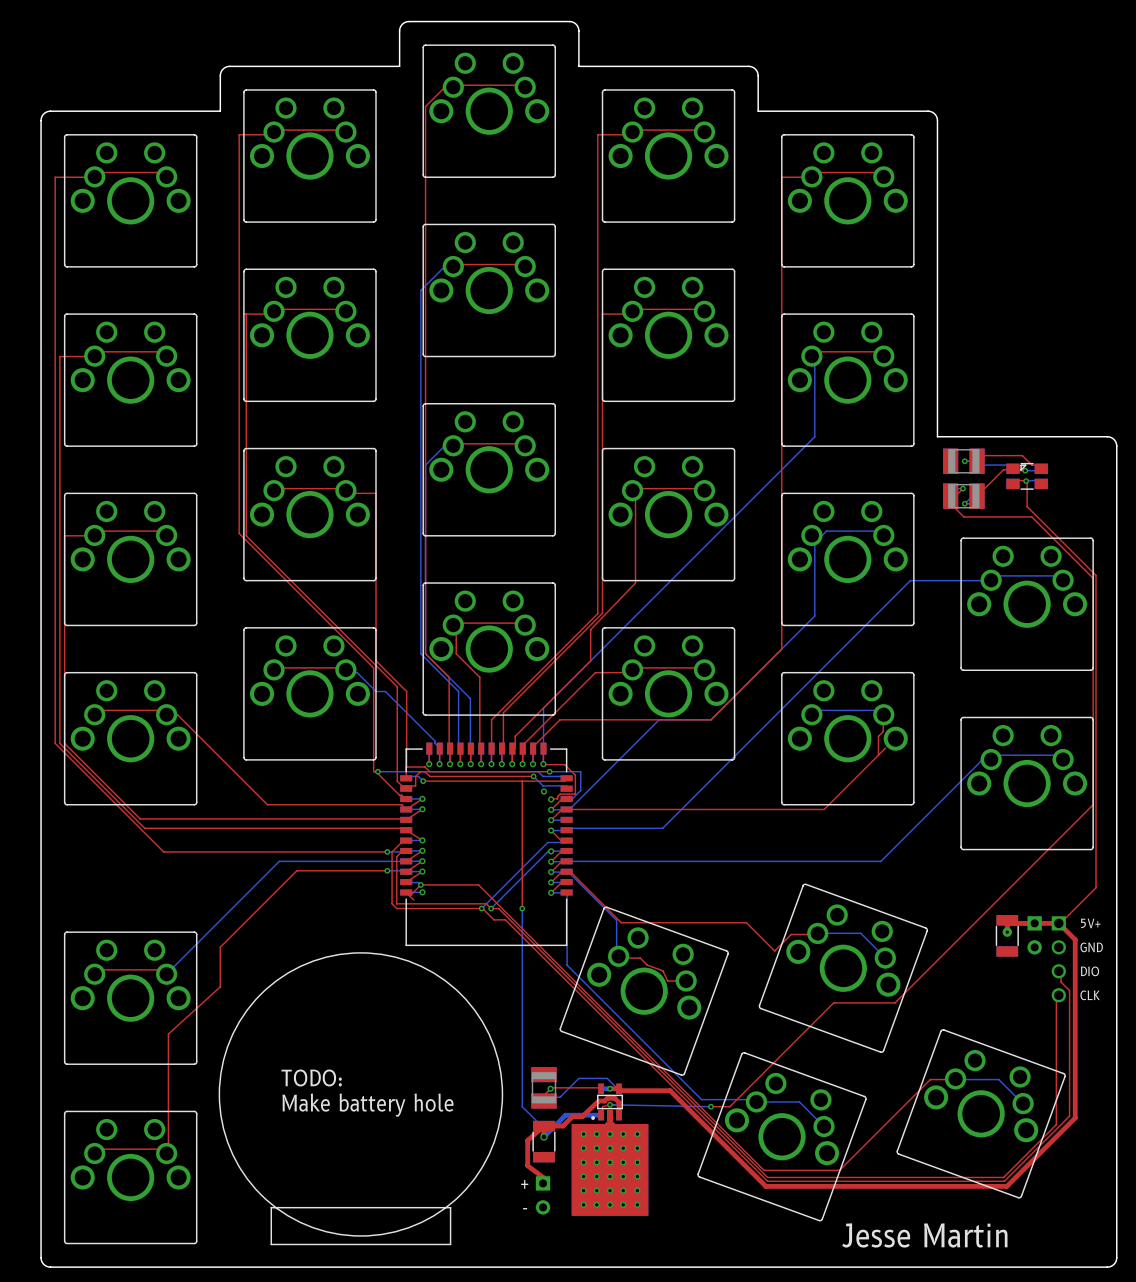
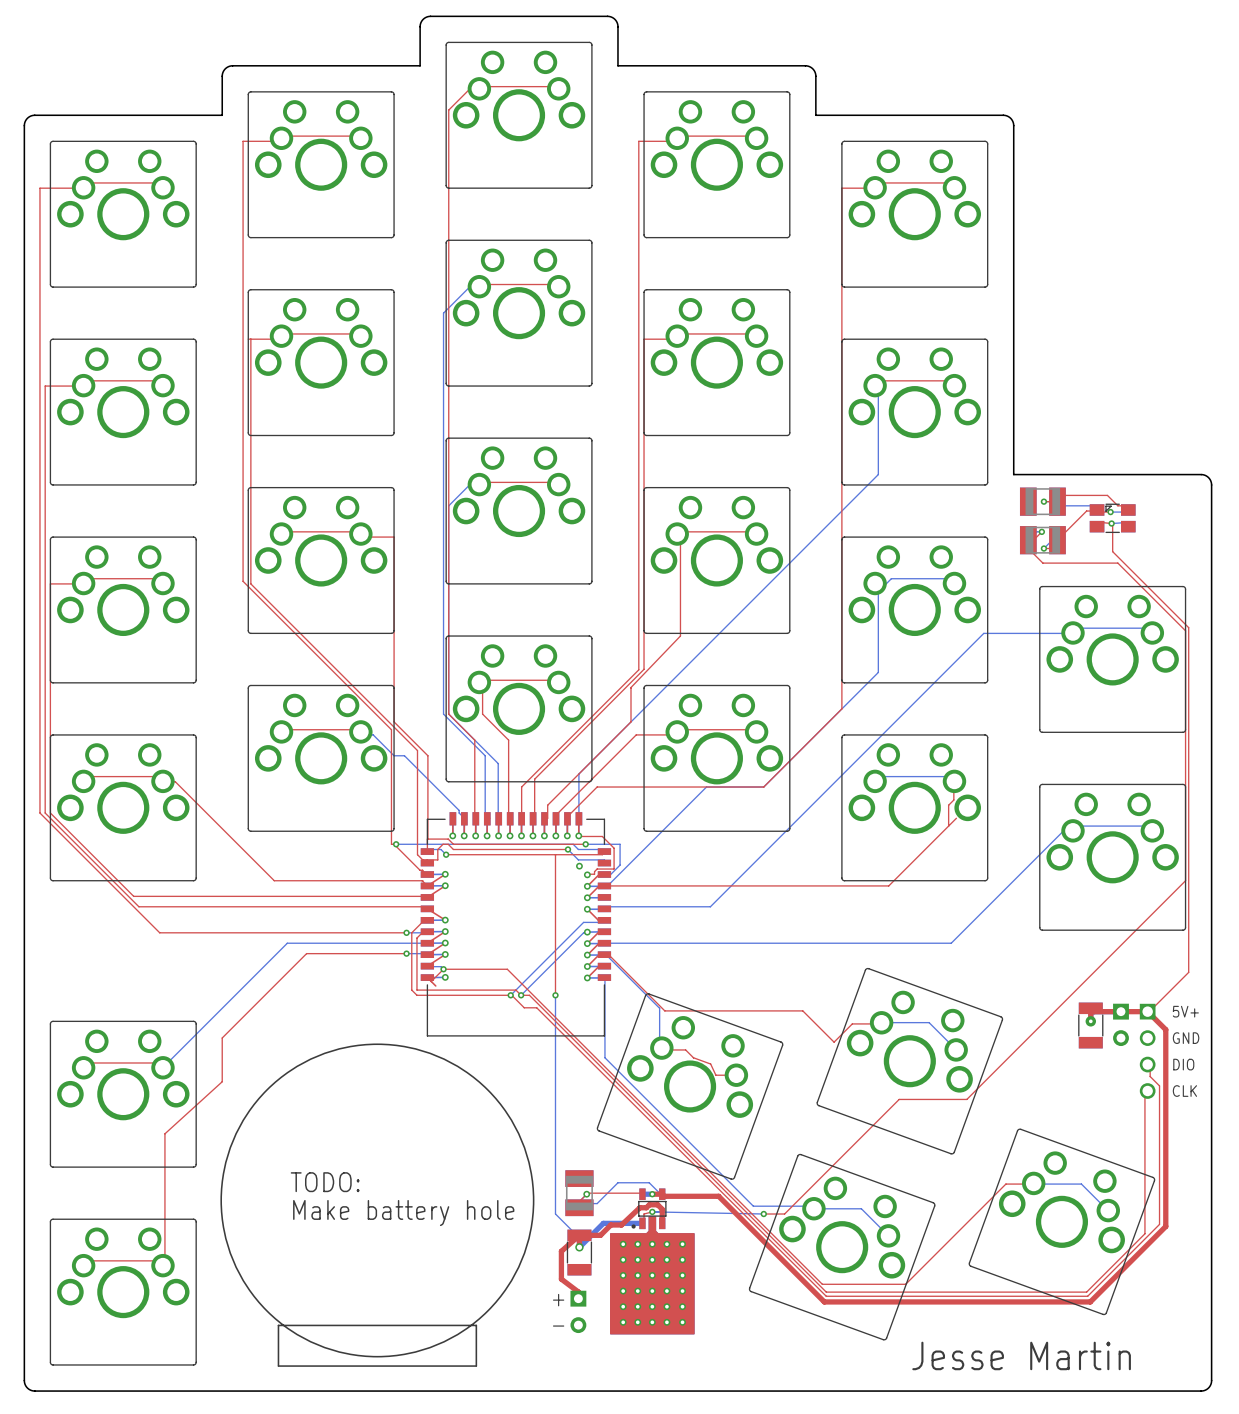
part: (610, 1149) -> none
part: none -> (652, 1261)

